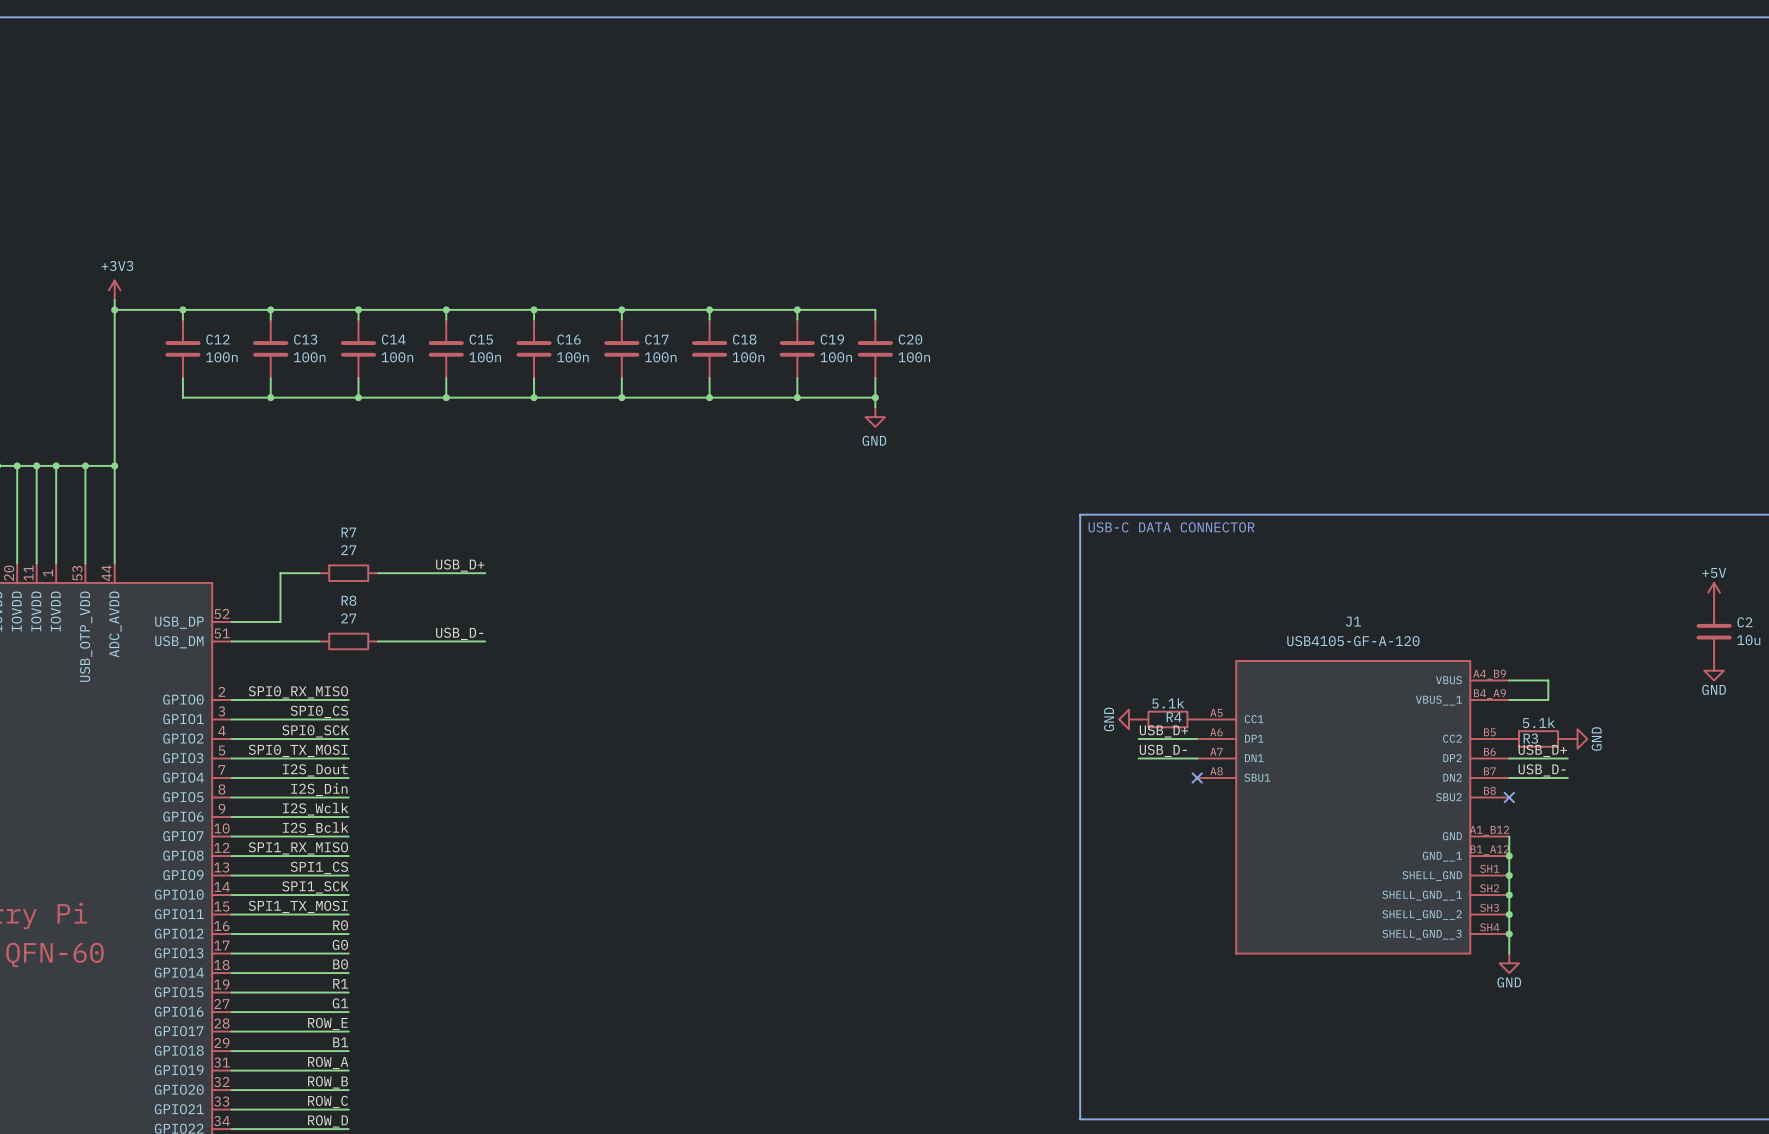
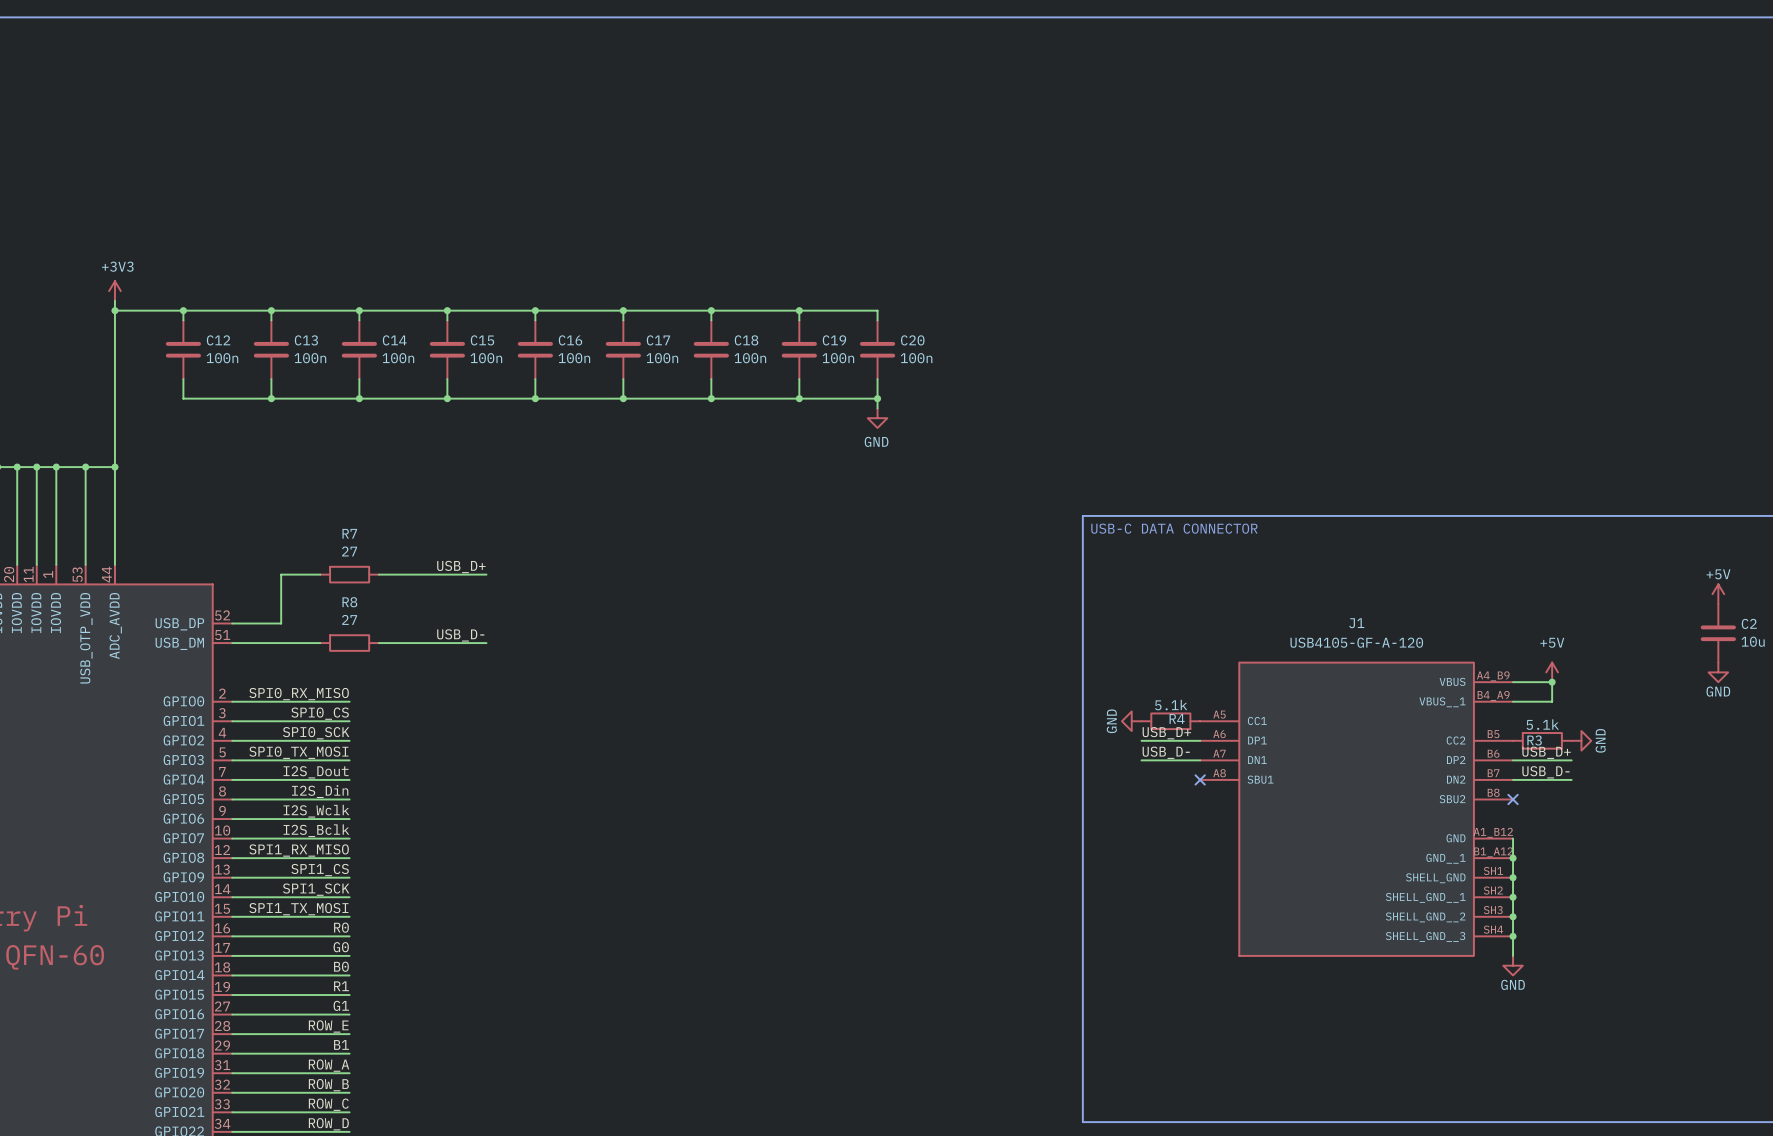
power symbol: none -> +5V (1552, 672)
junction: none -> (1552, 682)

